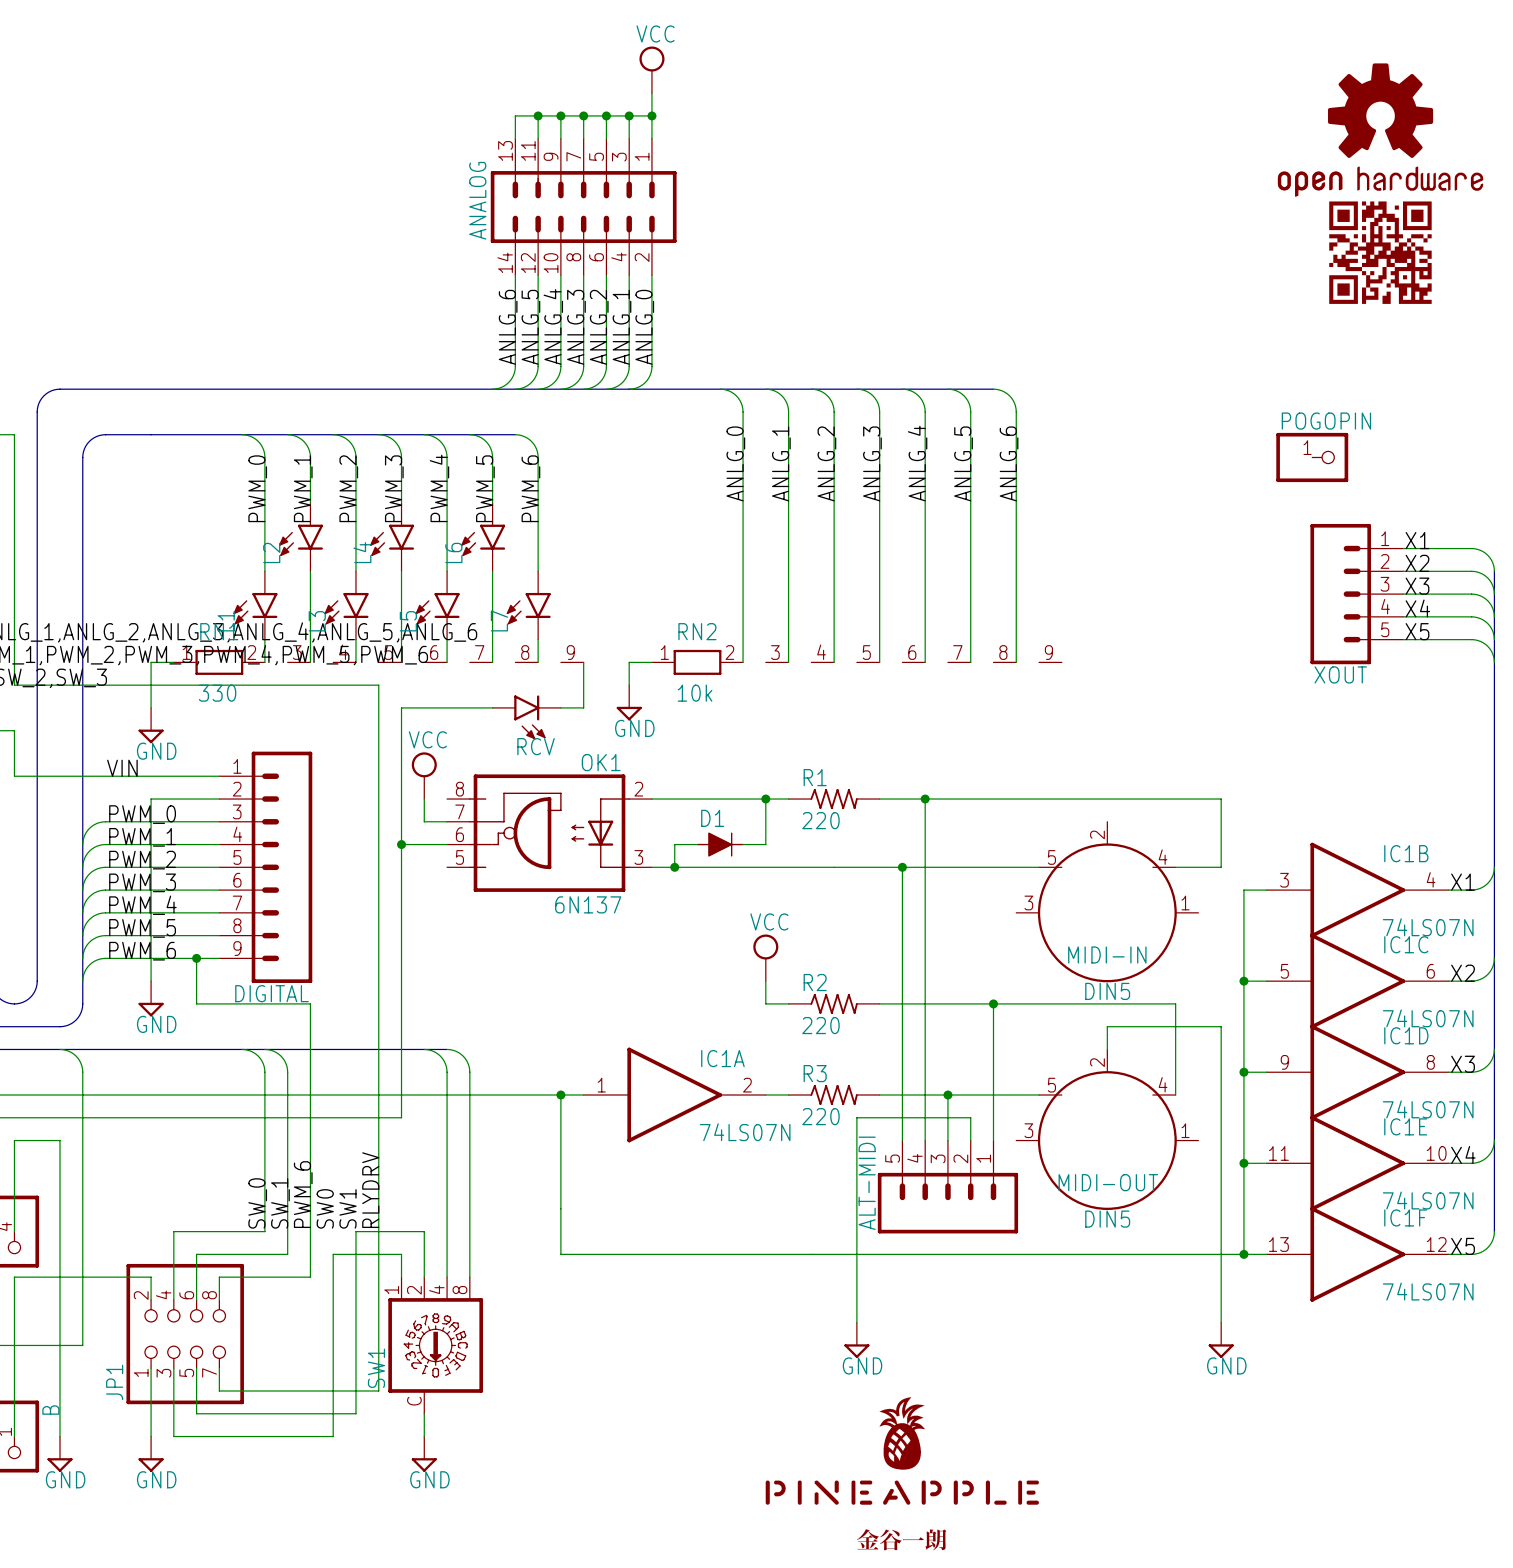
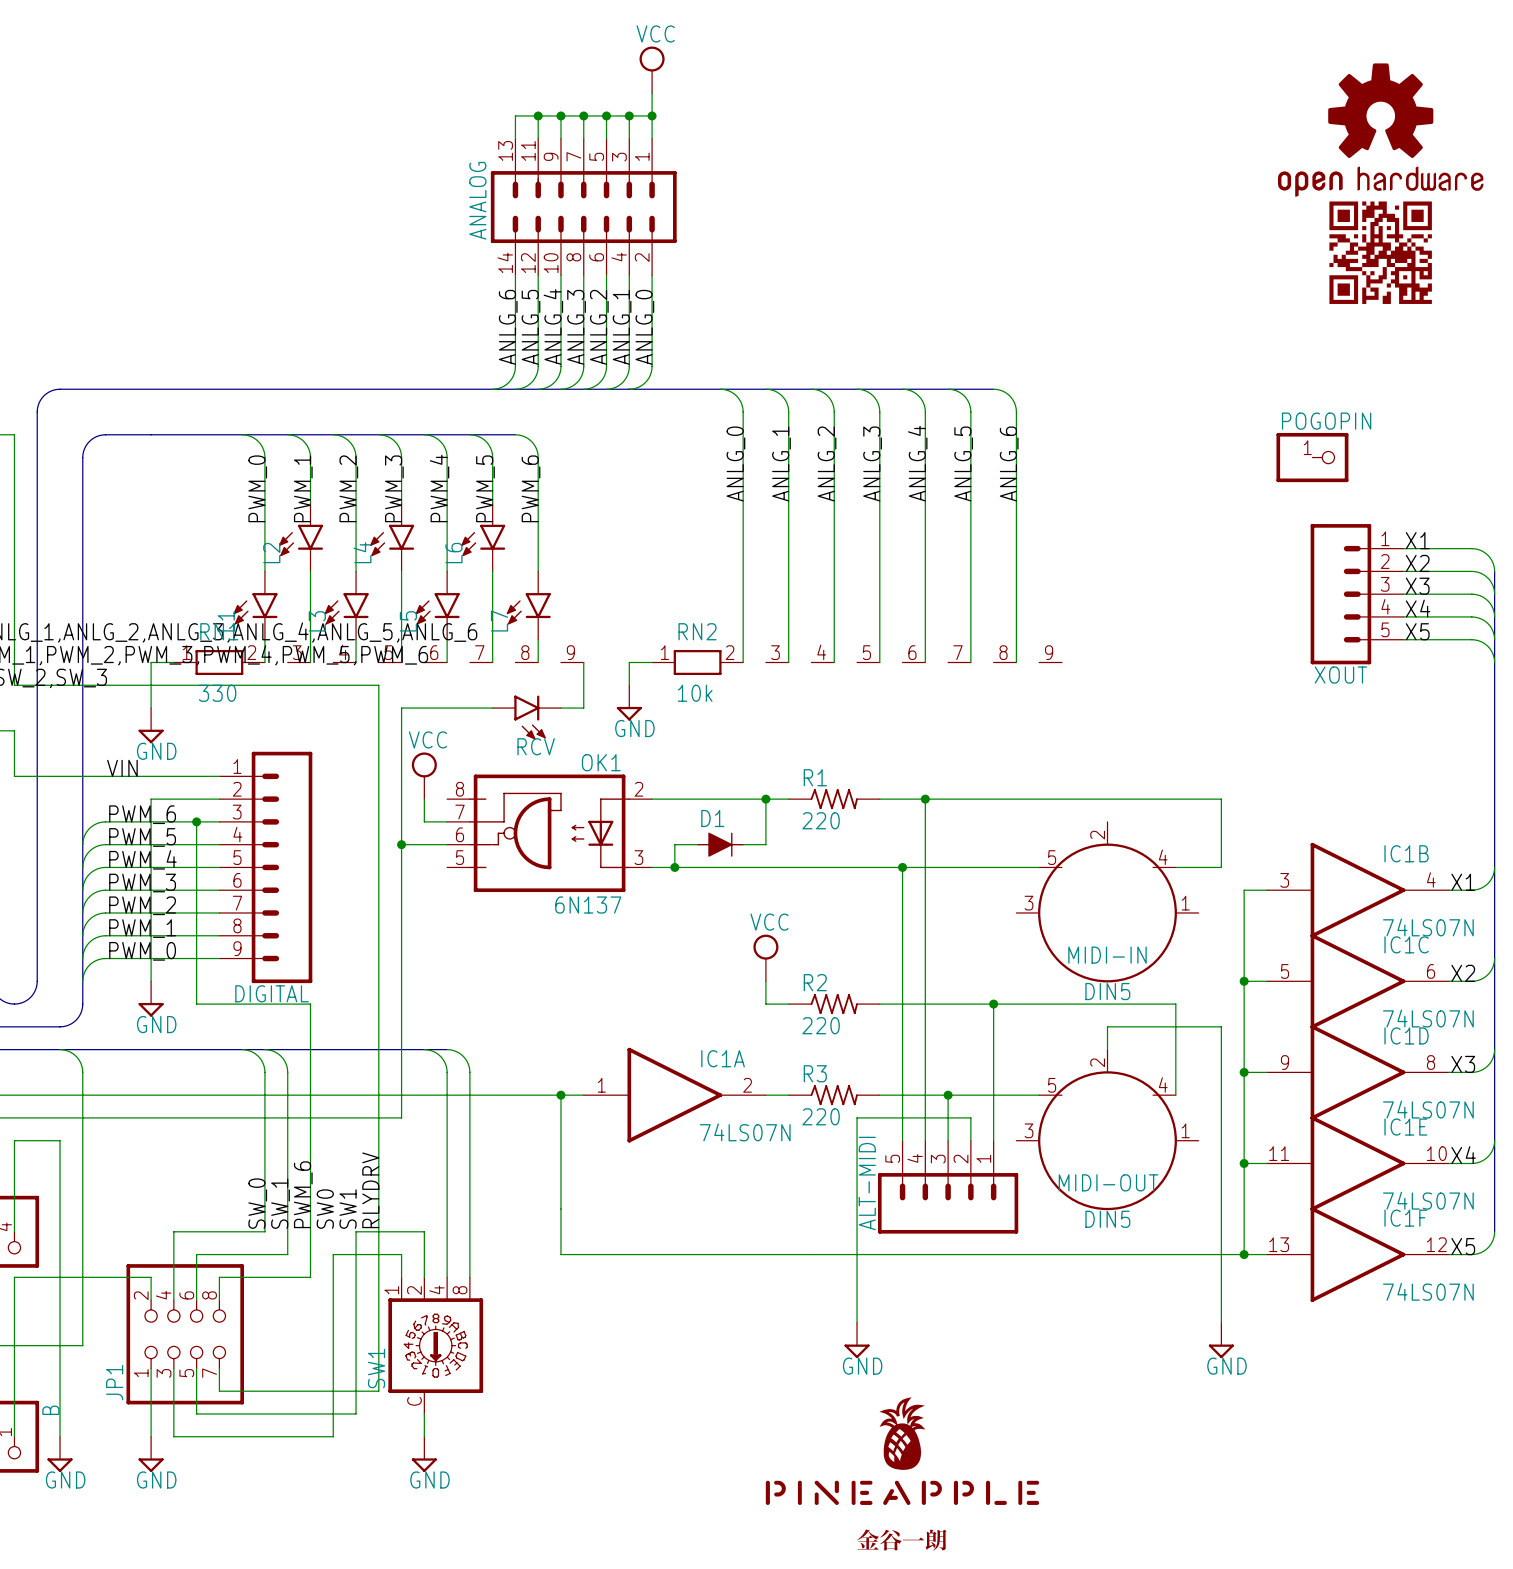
label: PWM_0 (142, 814) -> PWM_6 (142, 814)
wire: none -> (196, 821) (196, 958)
junction: none -> (196, 821)
label: PWM_1 (142, 837) -> PWM_5 (142, 837)
label: PWM_2 (142, 860) -> PWM_4 (142, 859)
label: PWM_4 (142, 905) -> PWM_2 (142, 905)
label: PWM_5 (142, 928) -> PWM_1 (142, 928)
label: PWM_6 (142, 951) -> PWM_0 (142, 951)
junction: (196, 958) -> none

